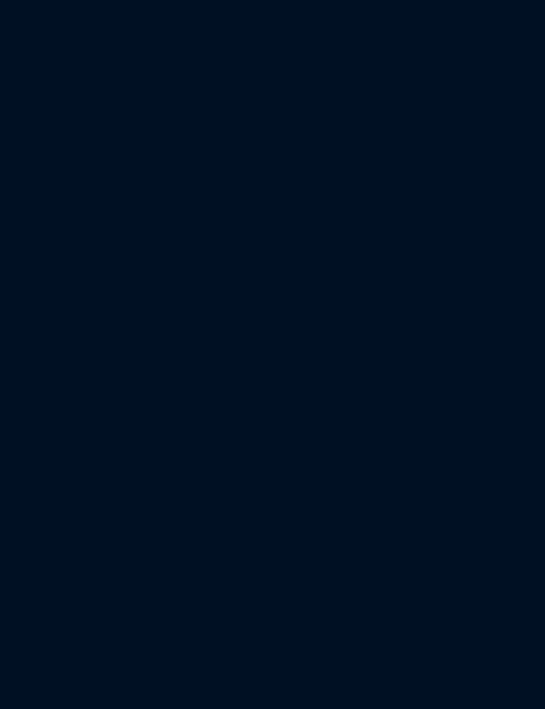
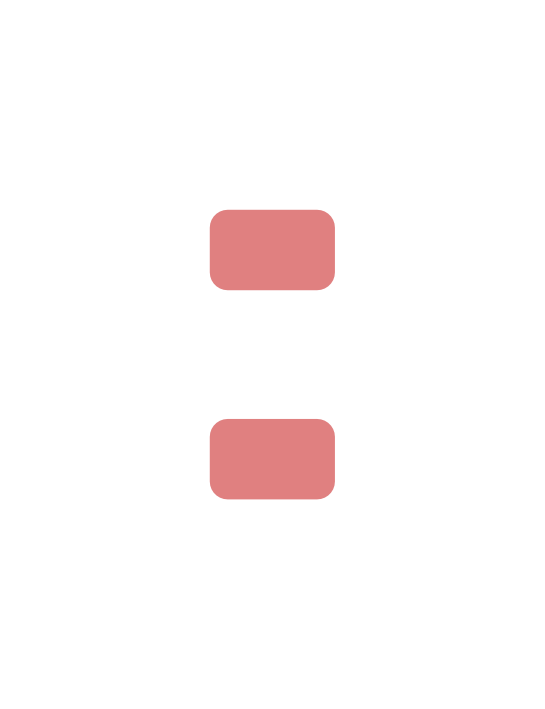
part: none -> (272, 354)

